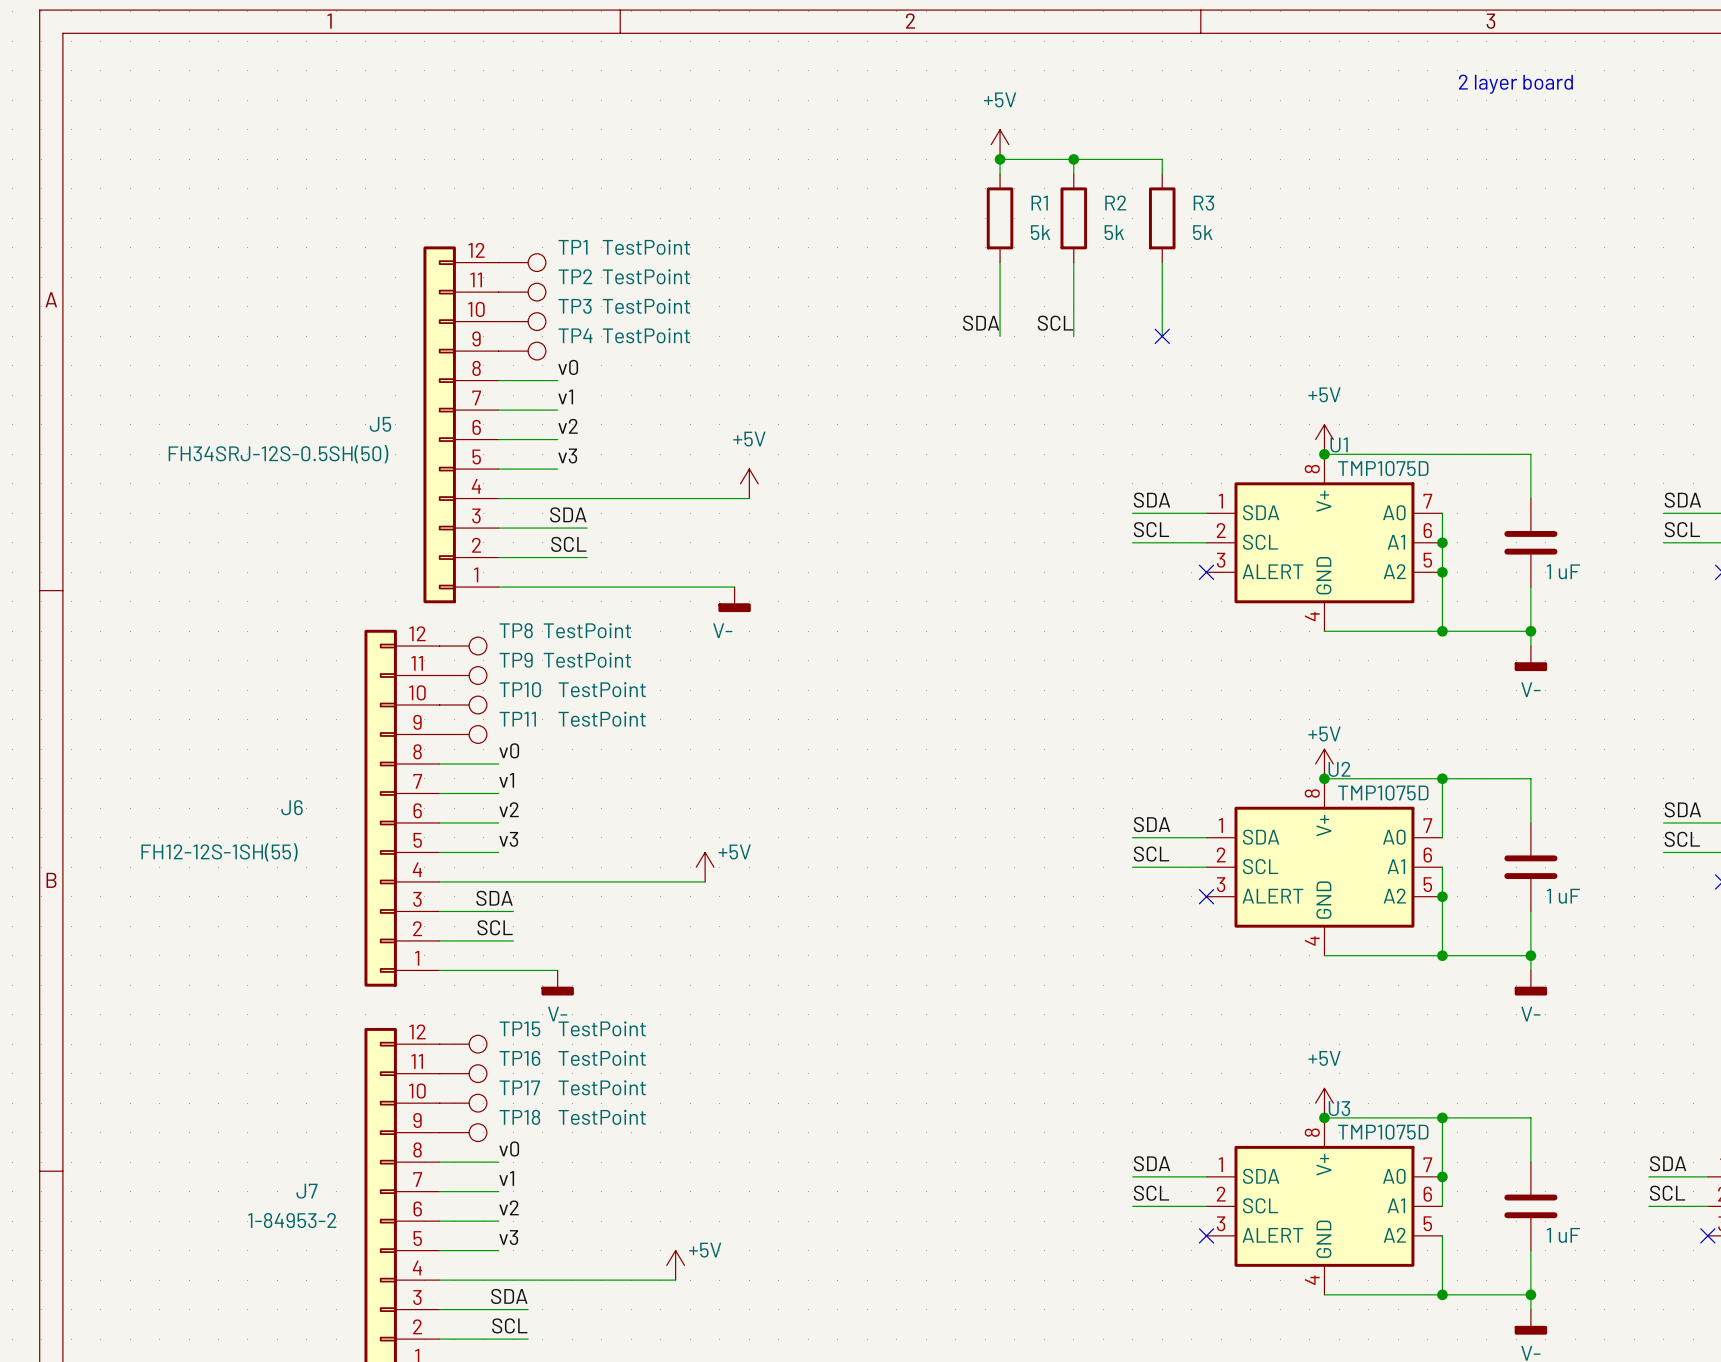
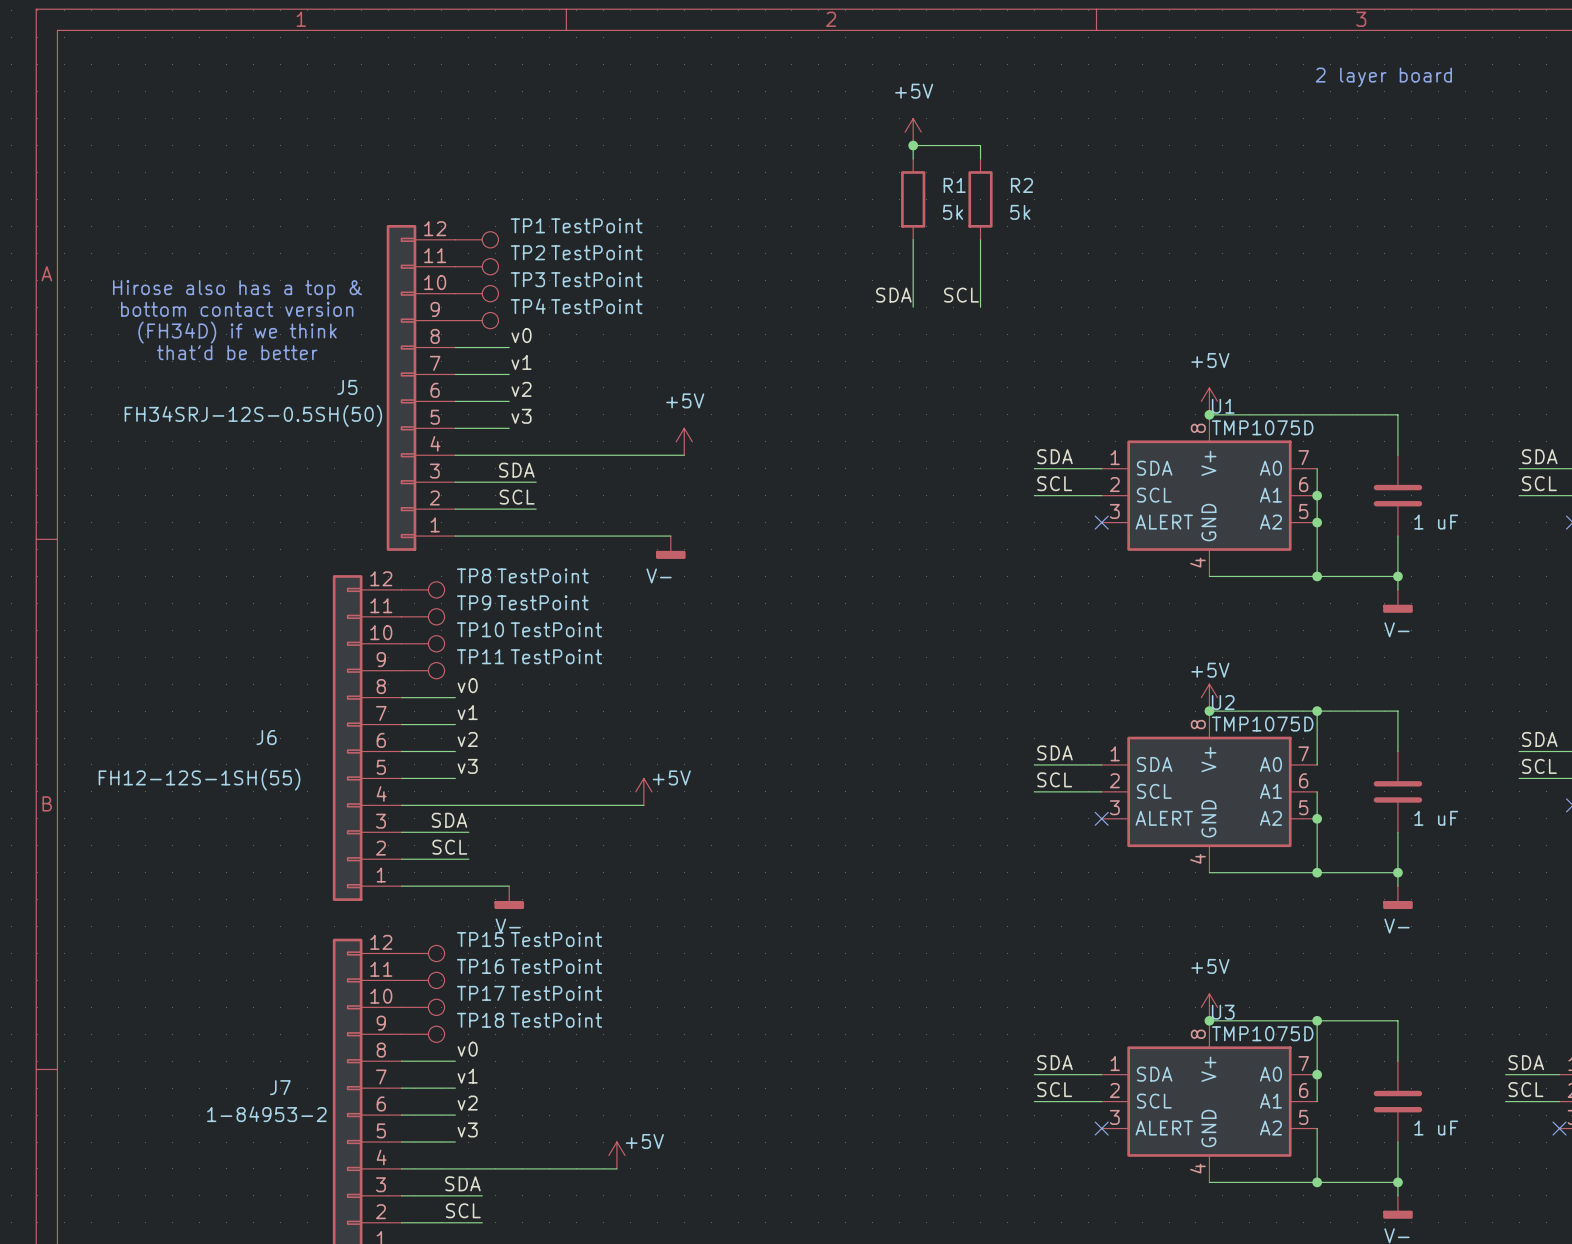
wire: (1073, 159) (1162, 159) (1162, 174) -> none
junction: (1073, 159) -> none
R3: 5k (1162, 218) -> none
wire: (1162, 262) (1162, 336) -> none
text: none -> Hirose also has a top & (237, 289)
no-connect mark: (1162, 336) -> none
text: none -> bottom contact version (237, 309)
text: none -> (FH34D) if we think (237, 332)
text: none -> that'd be better (237, 352)

